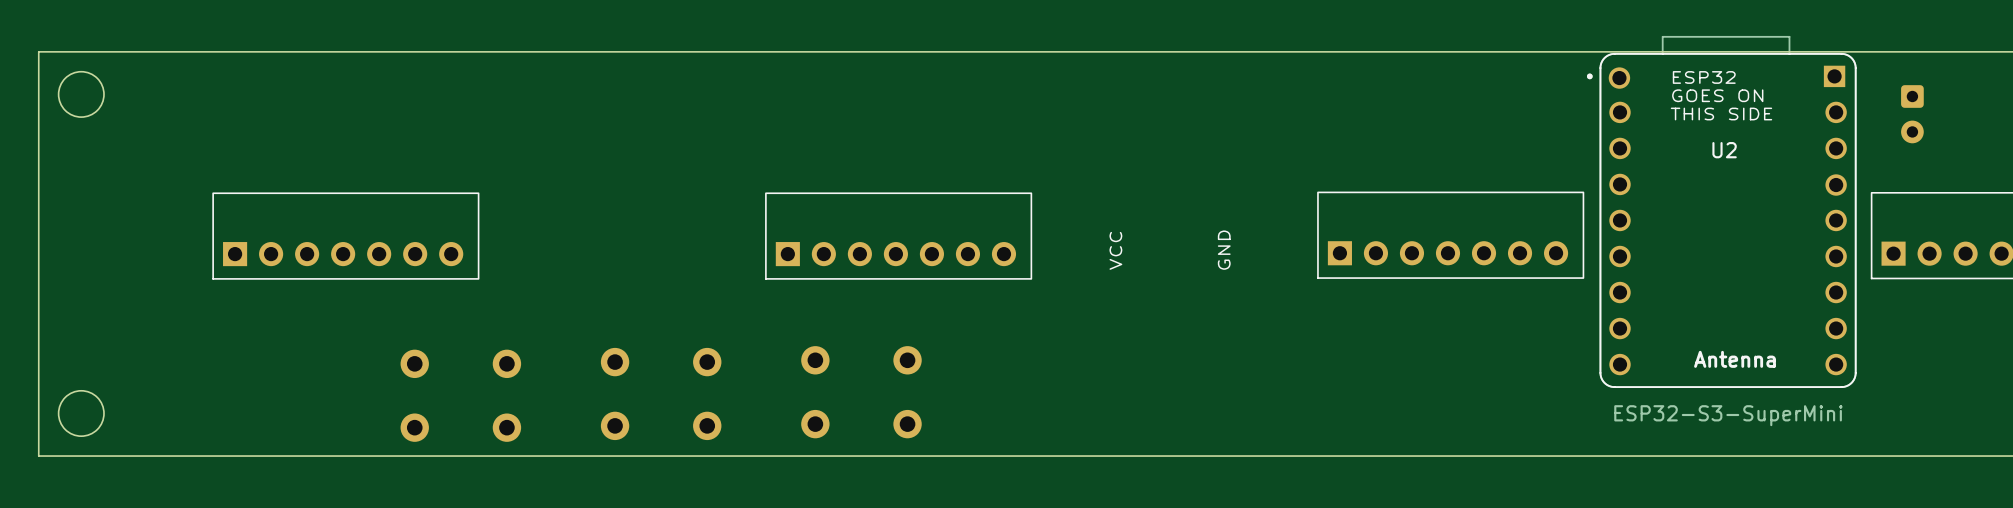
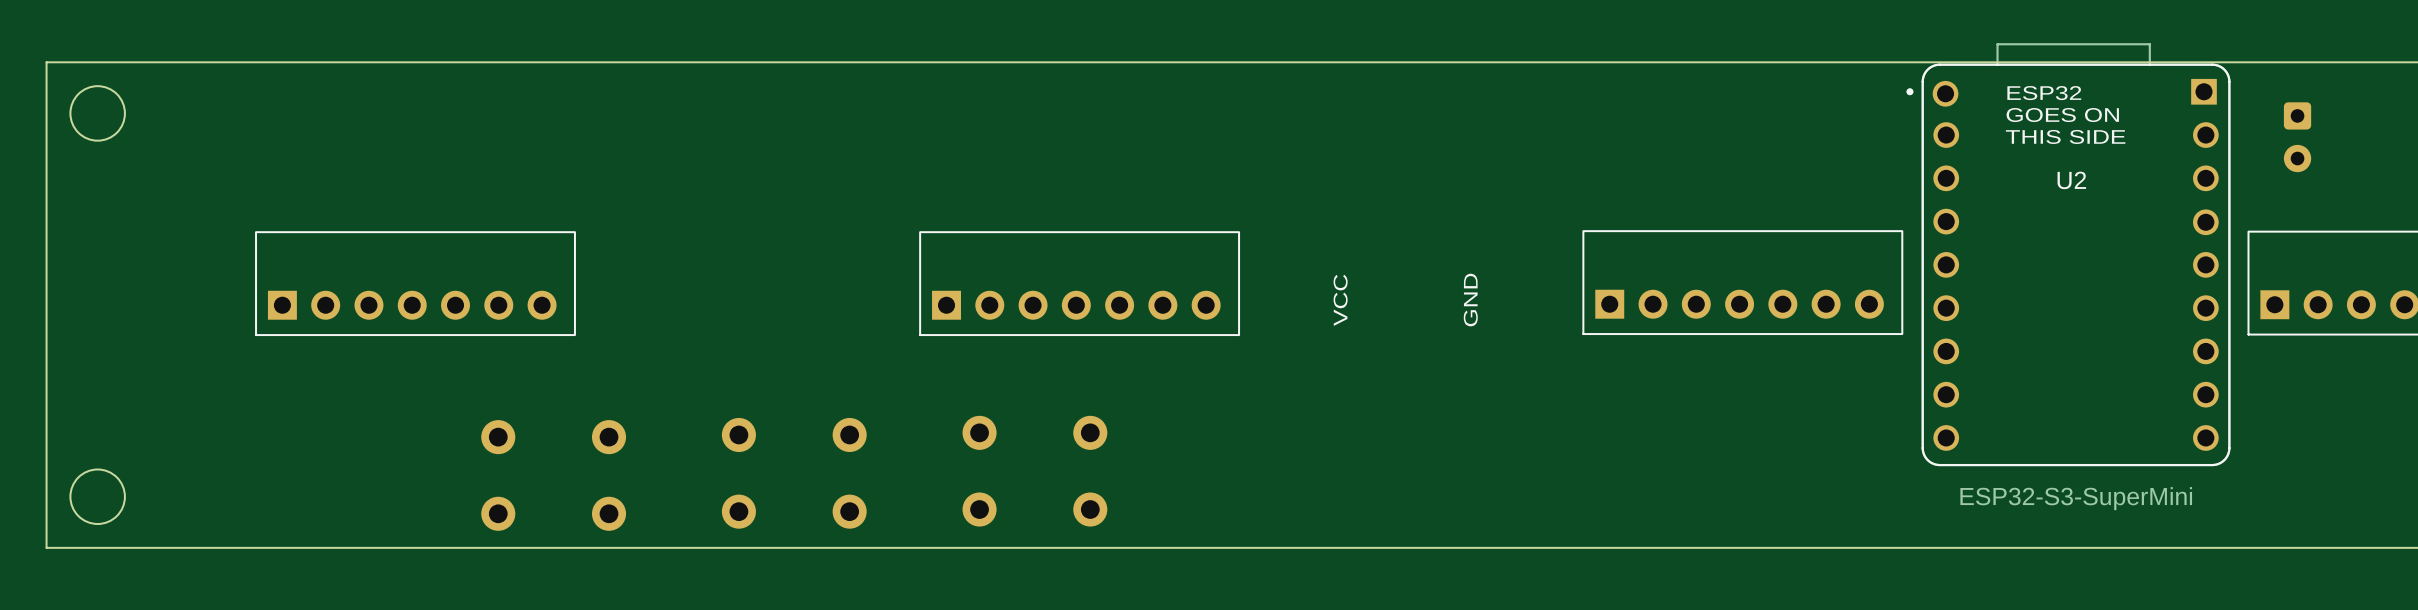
text: Antenna (1735, 359) -> none

